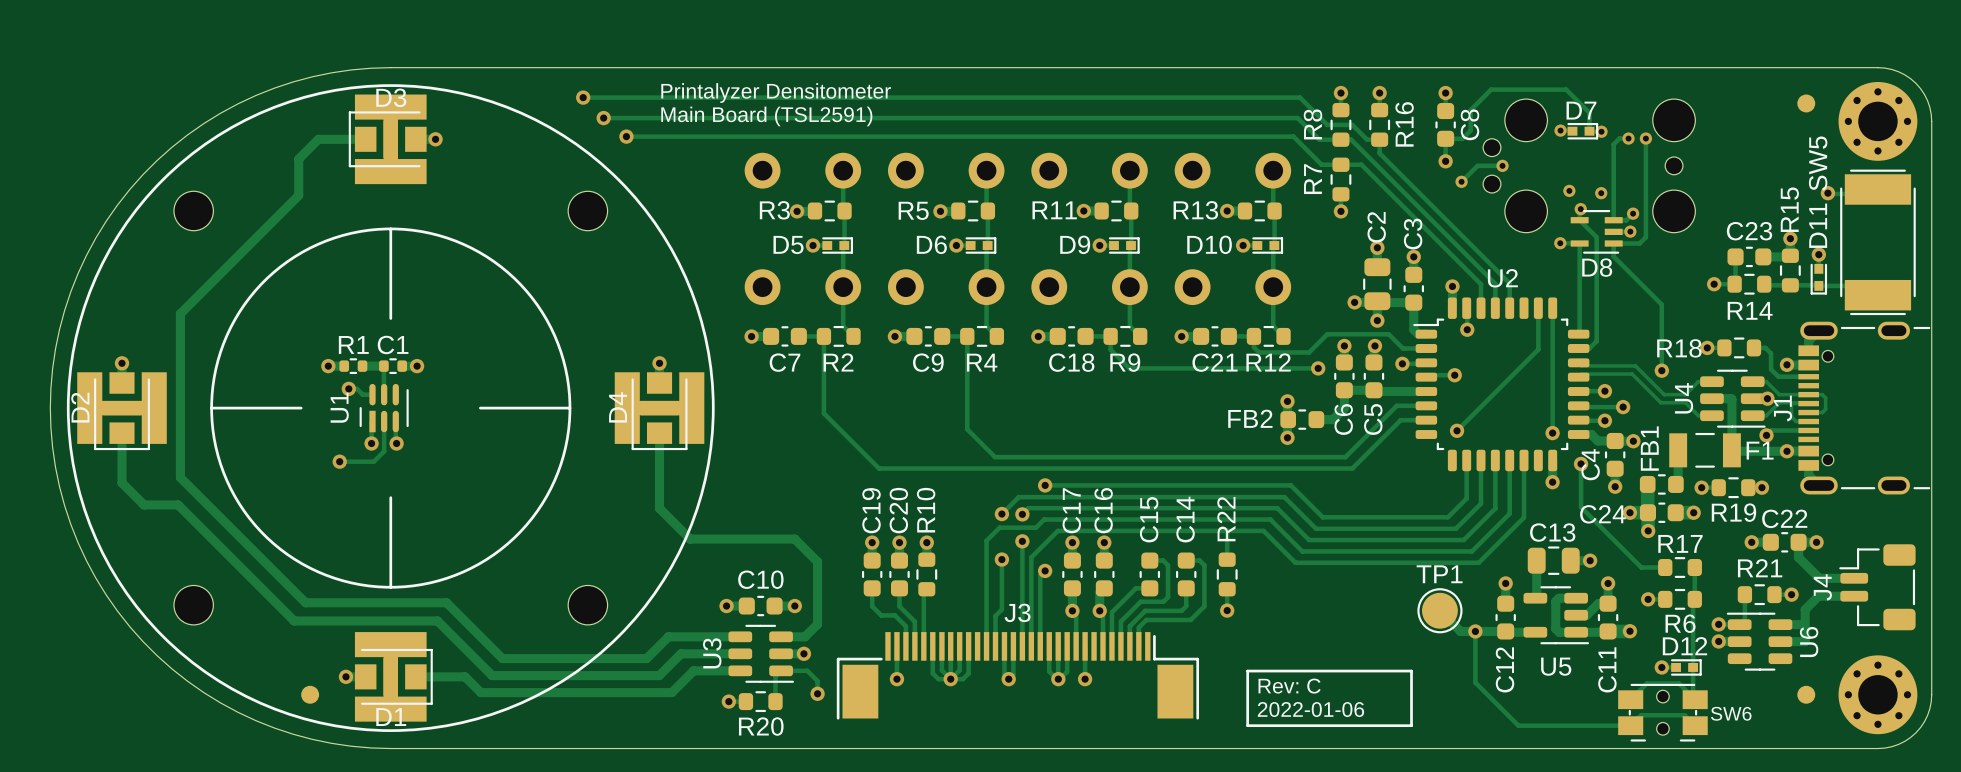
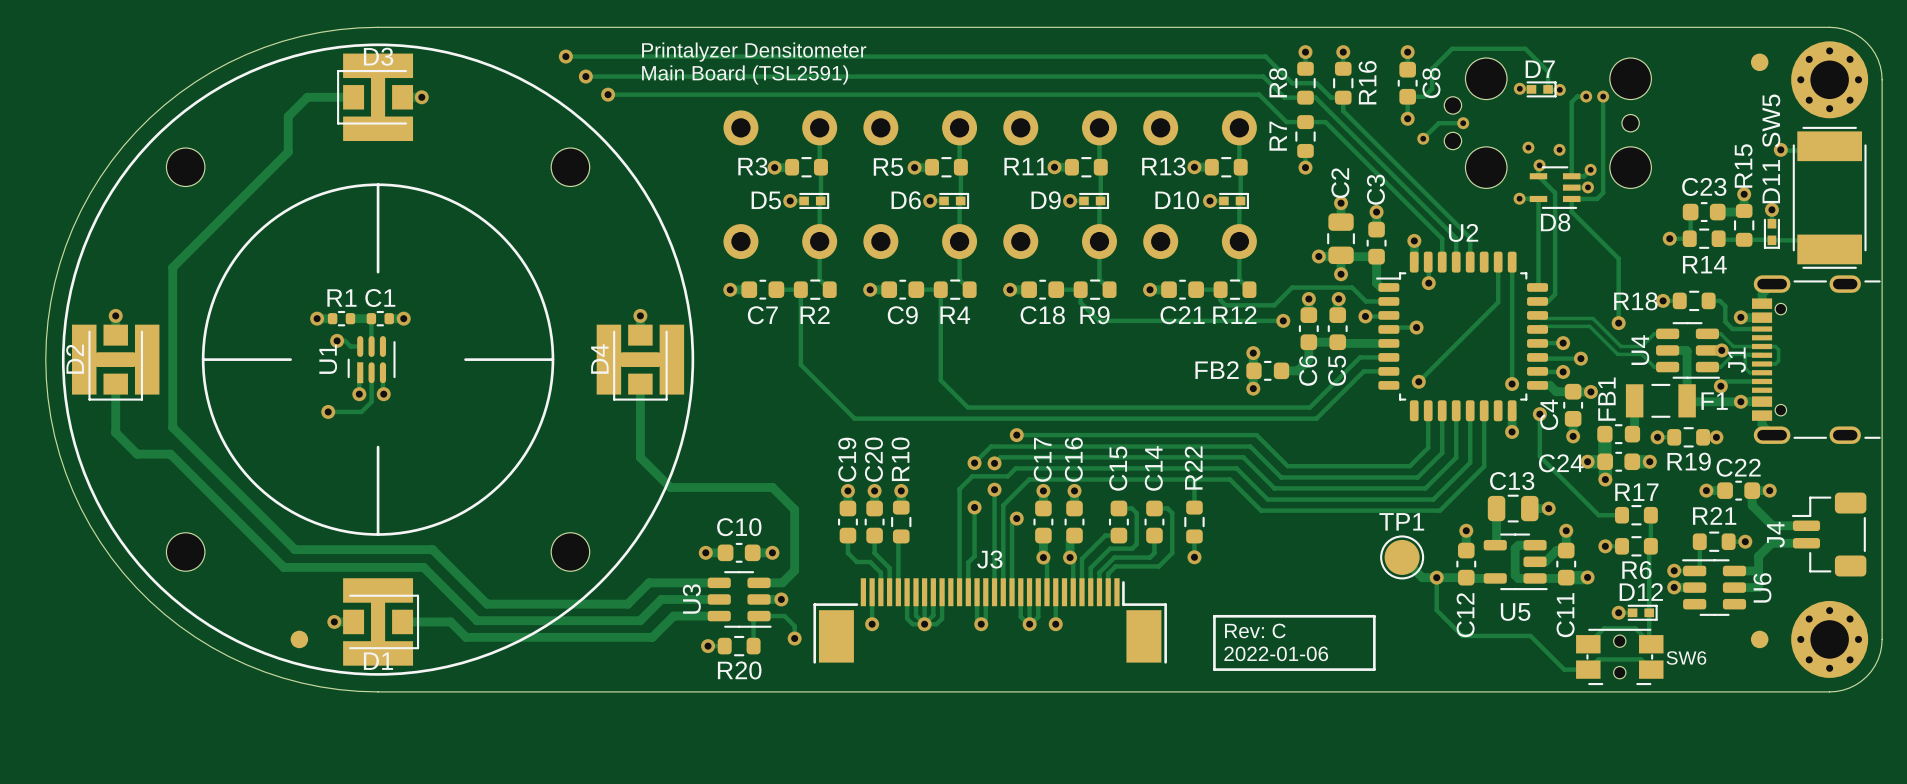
track: (1475, 664) (1475, 682) (1518, 725) (1606, 725) -> (1436, 610) (1462, 635) (1530, 635) (1564, 669)

